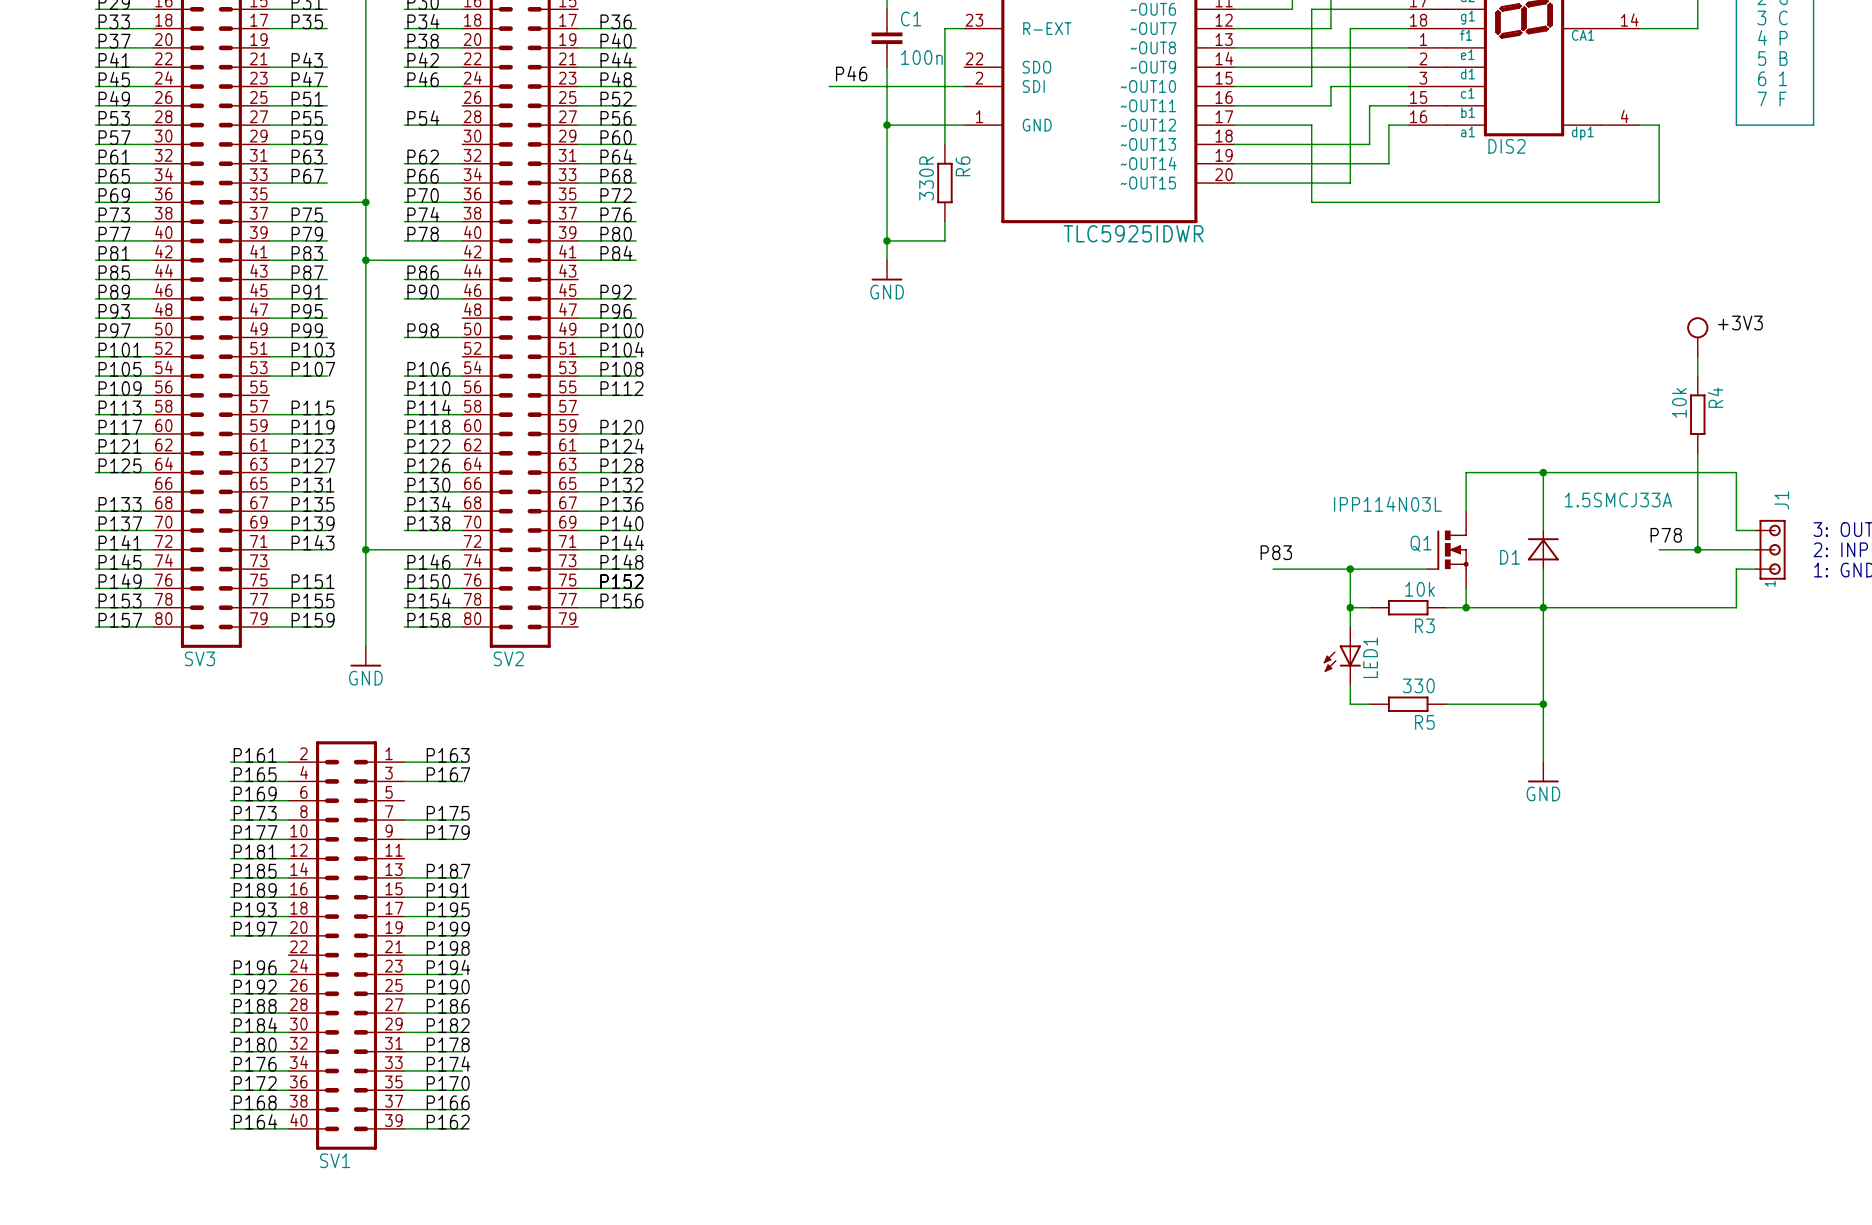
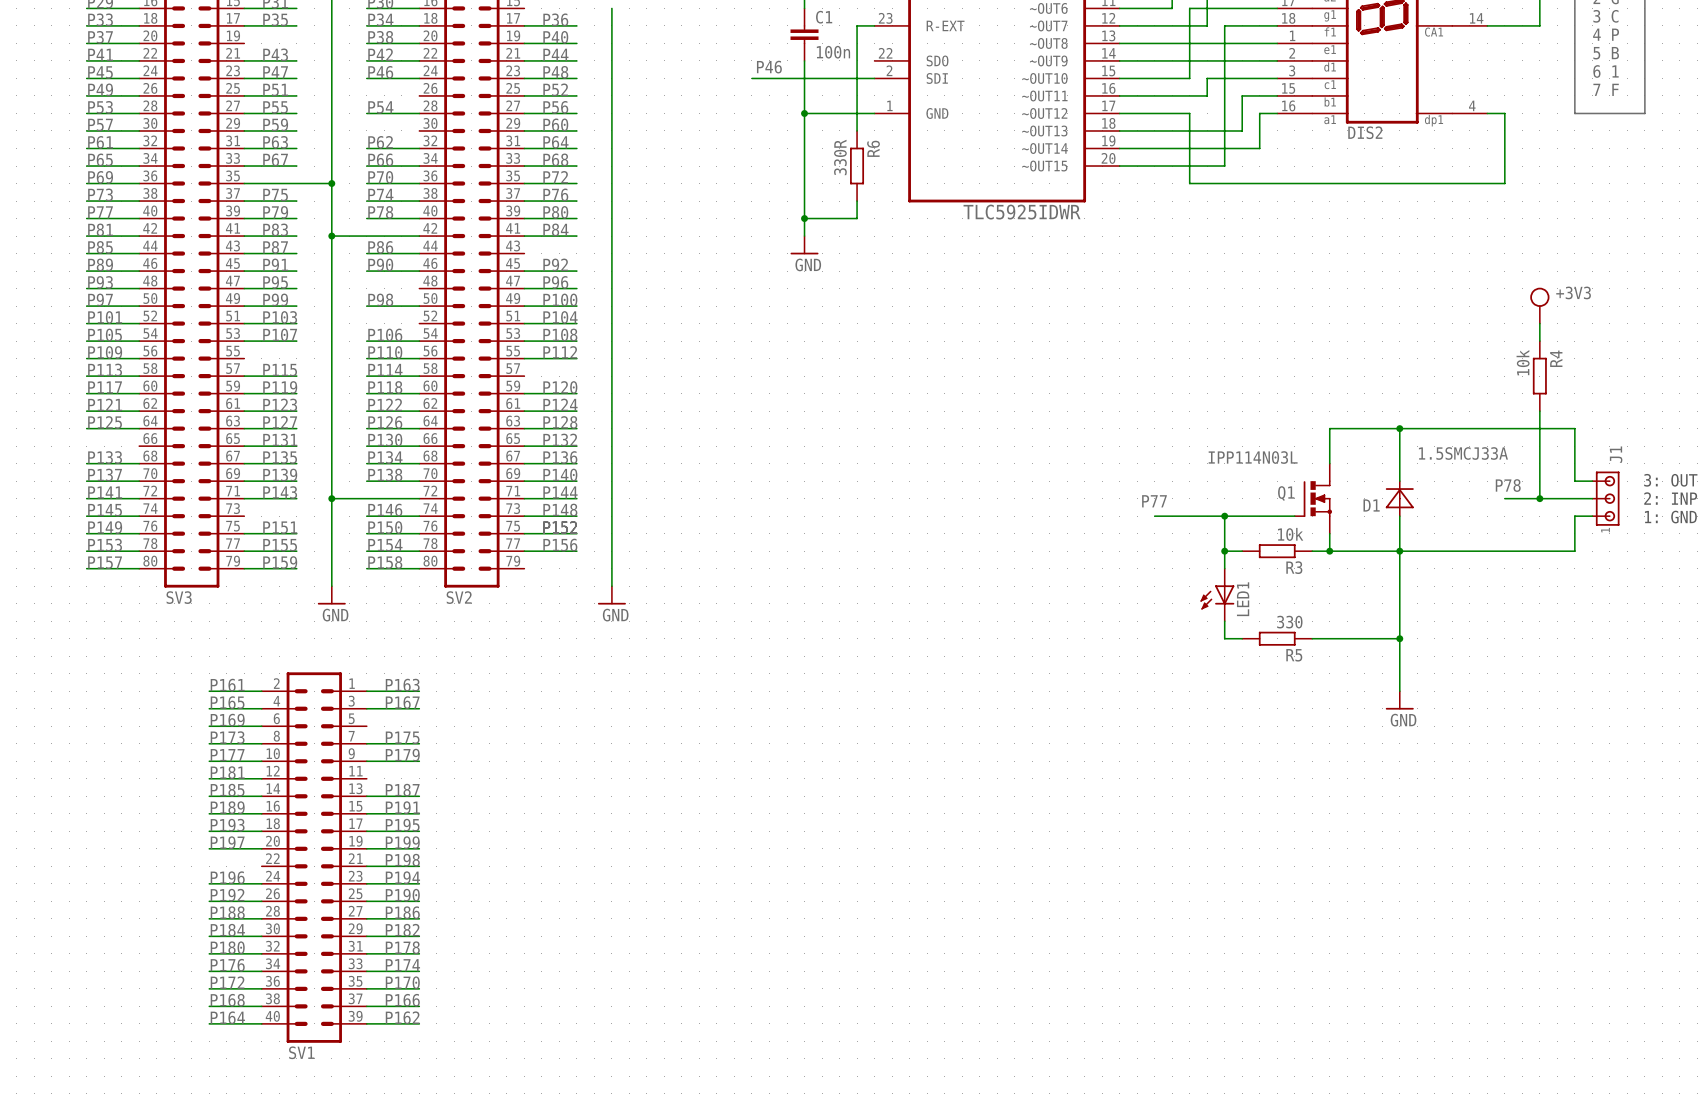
wire: none -> (611, 8) (611, 586)
label: P83 (1276, 552) -> P77 (1154, 501)
power symbol: none -> GND (611, 595)

